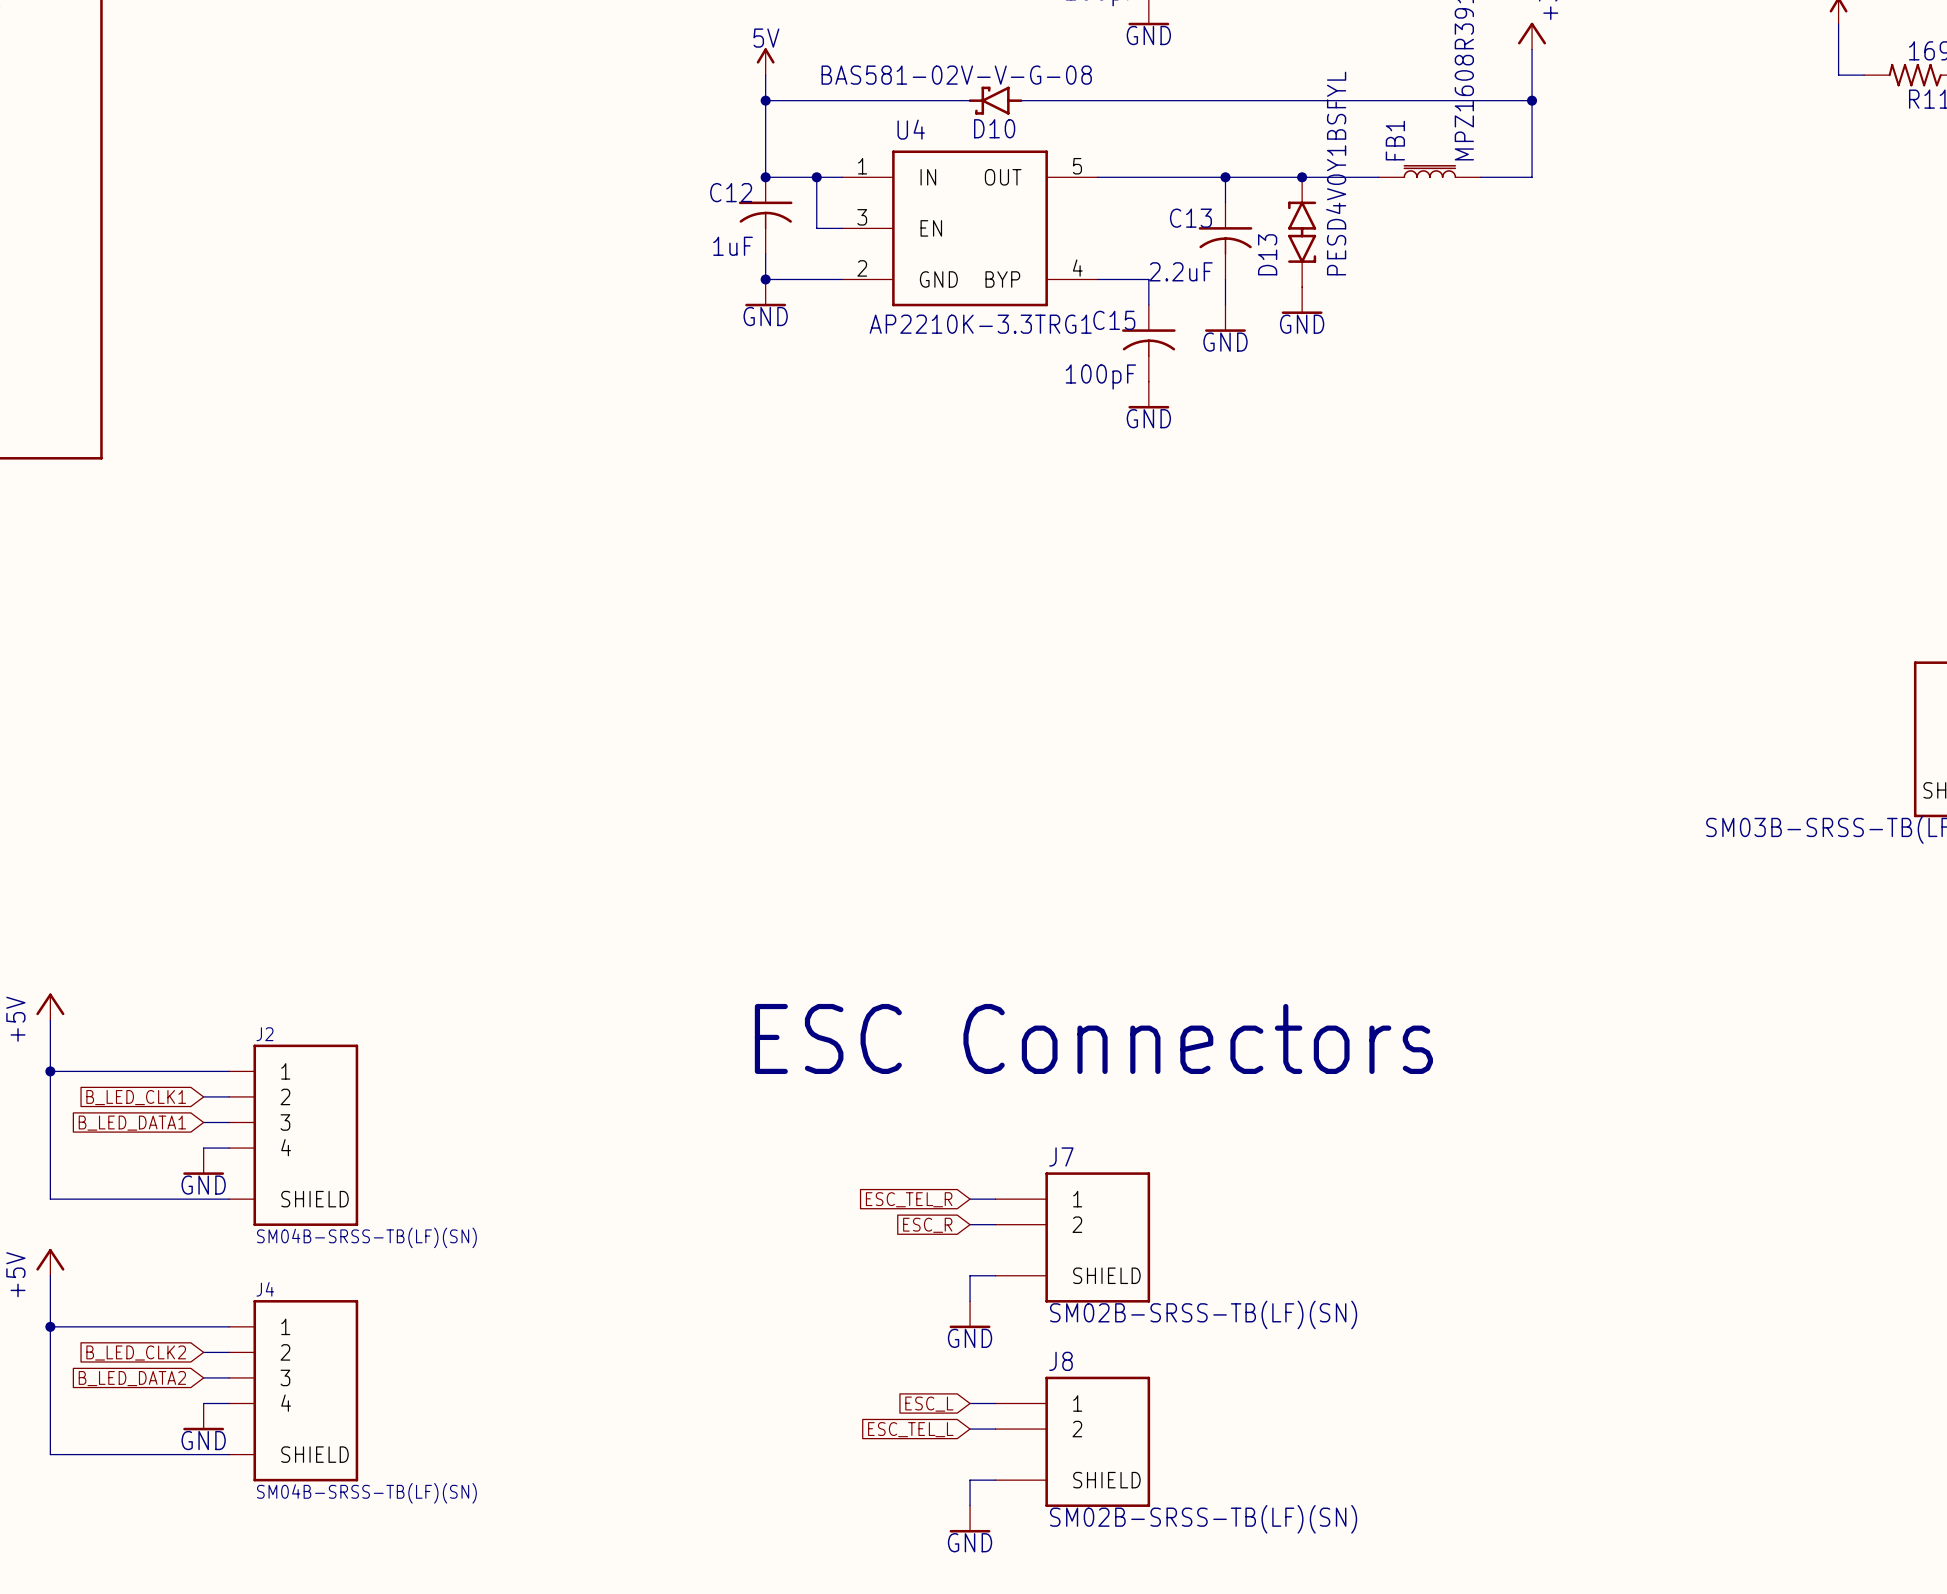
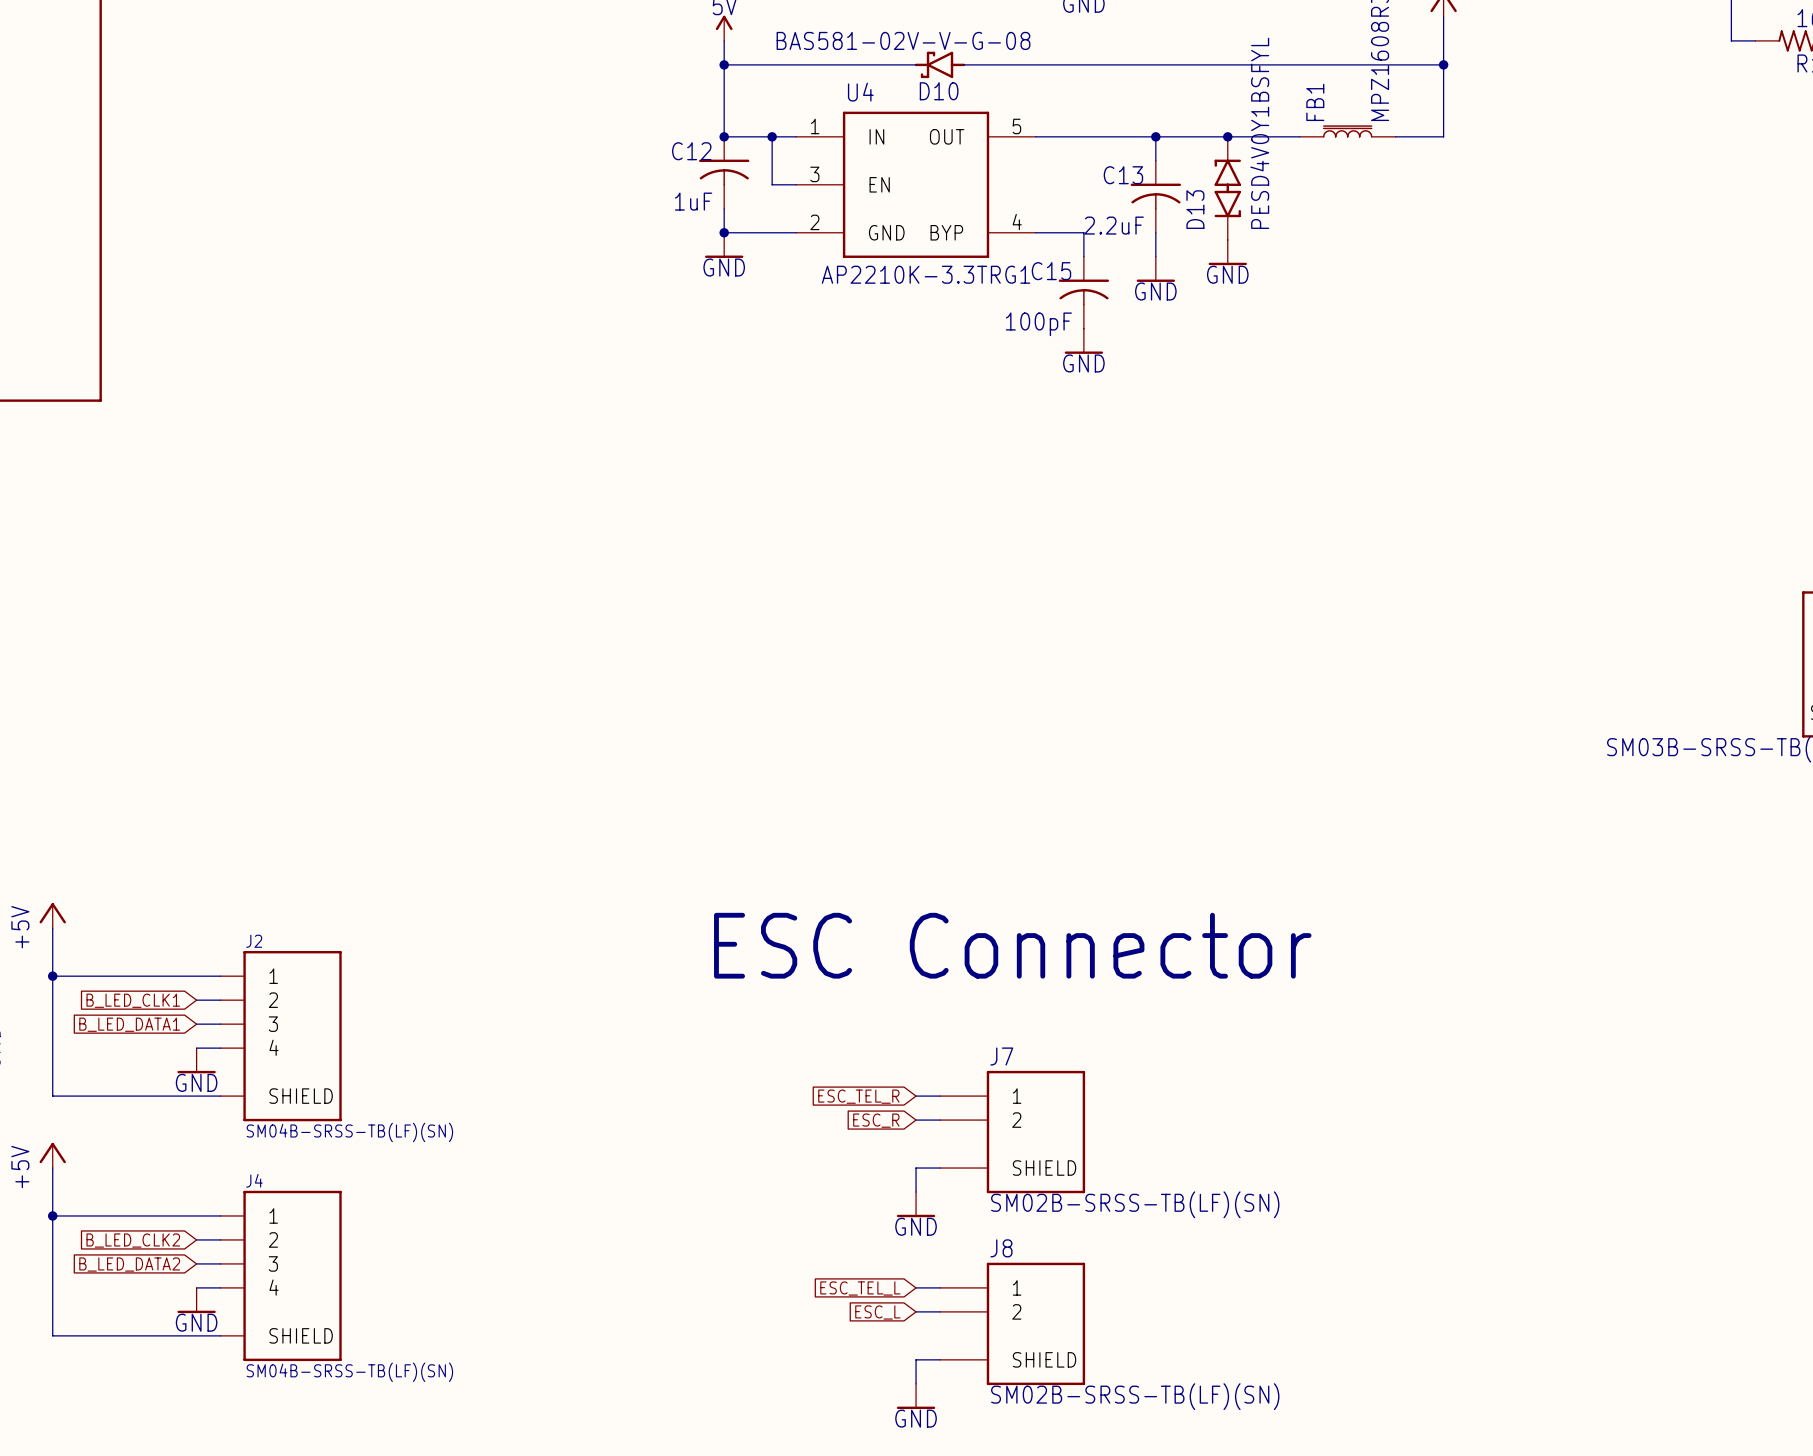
text: ESC Connectors (1093, 1038) -> ESC Connector (1012, 945)
global label: ESC_L (929, 1404) -> ESC_TEL_L (860, 1288)
global label: ESC_TEL_L (910, 1429) -> ESC_L (877, 1312)

